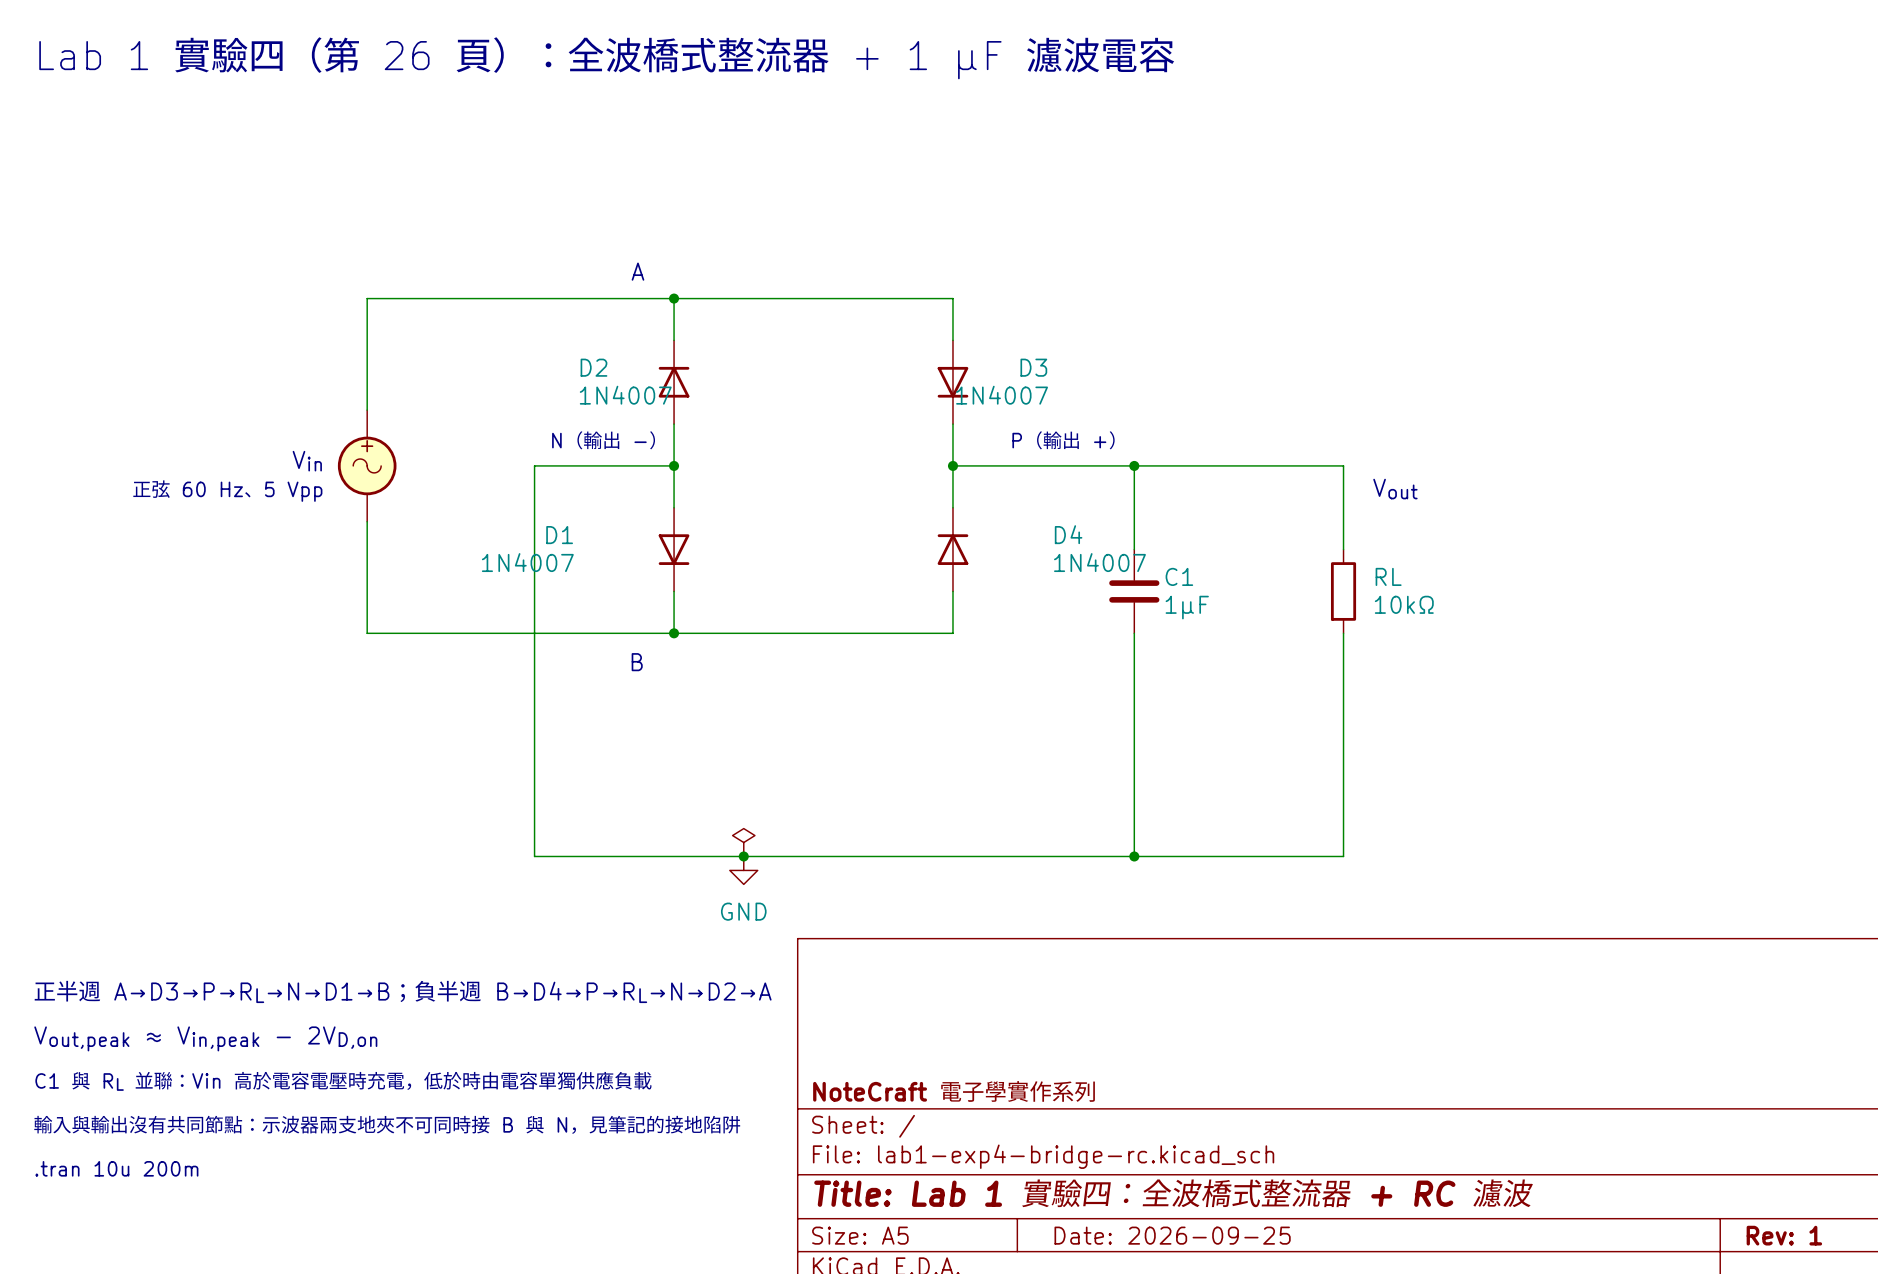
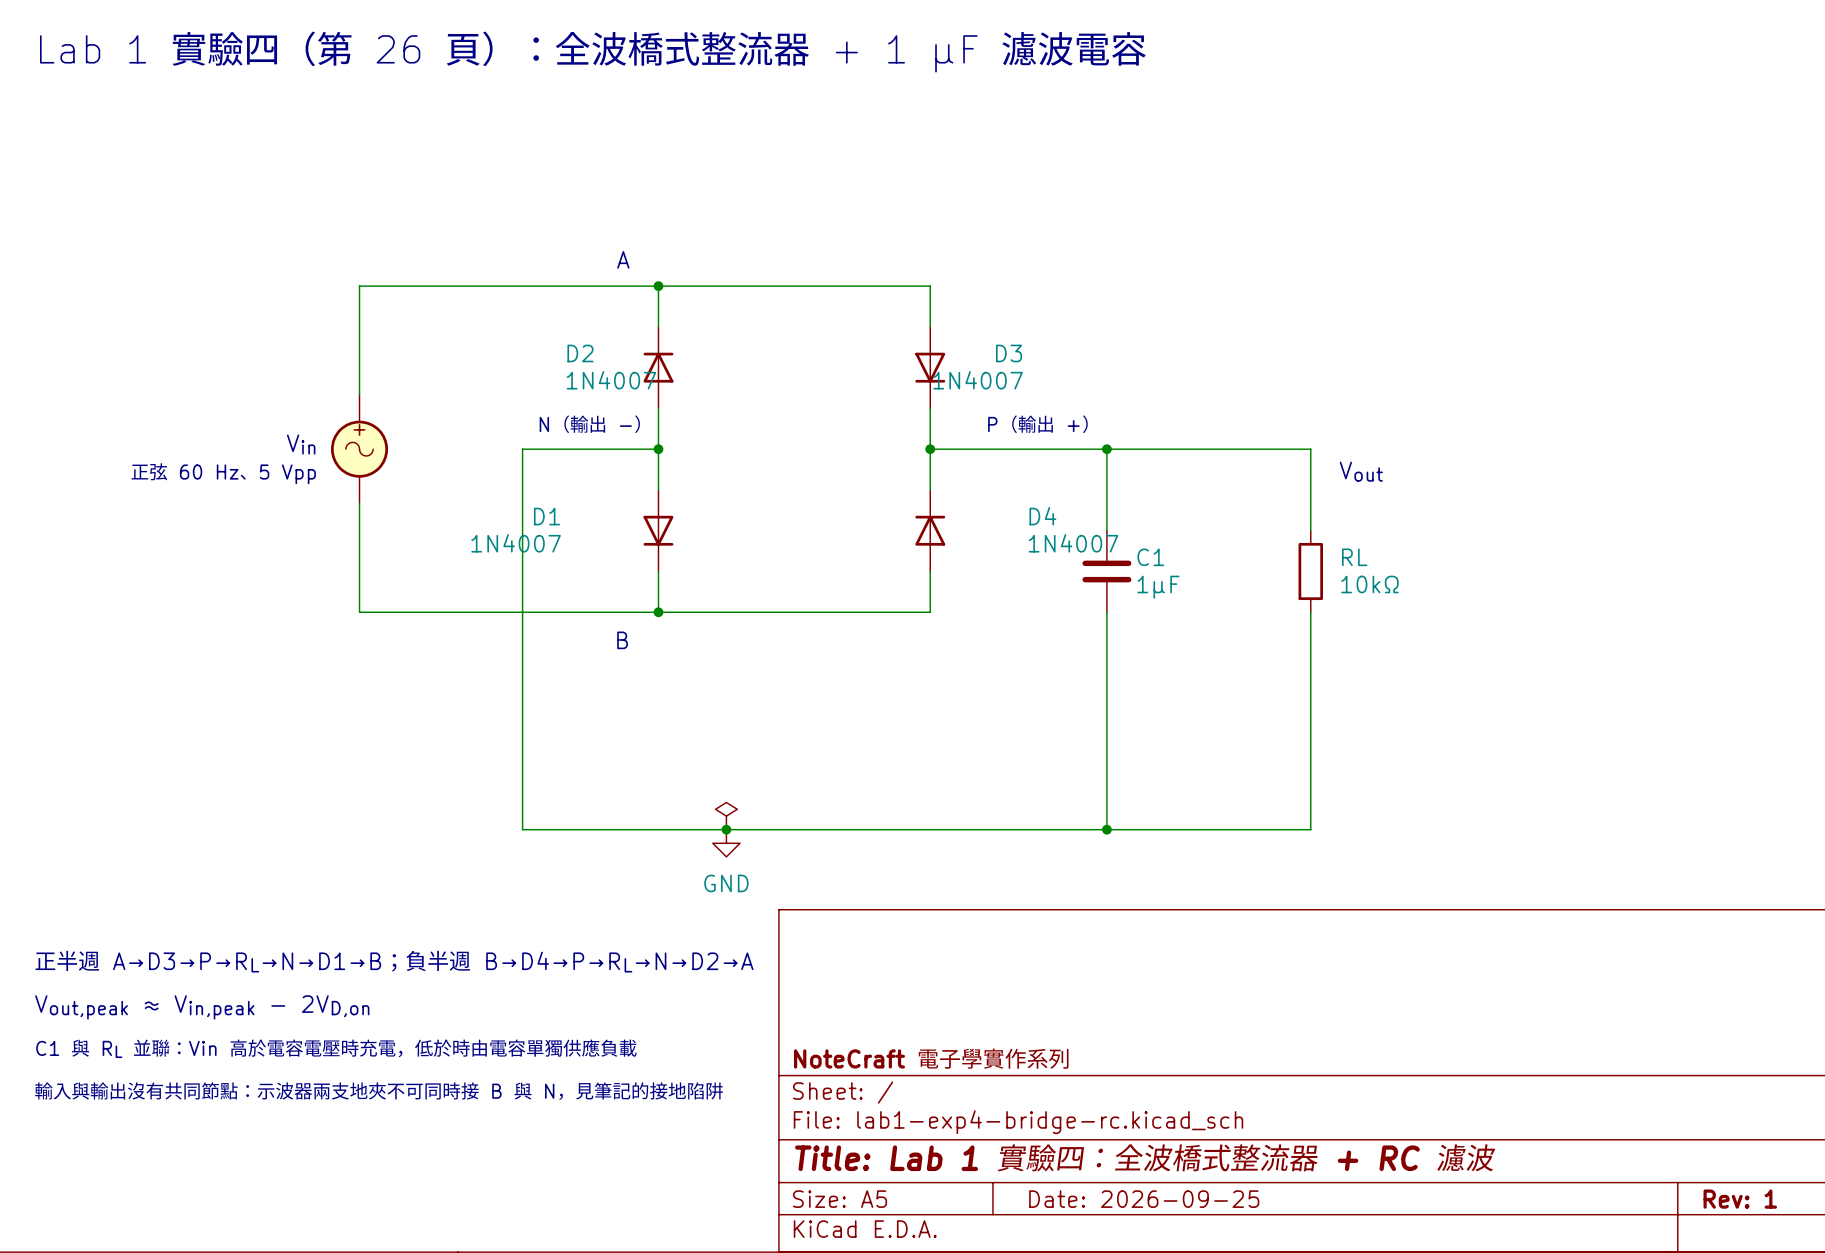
text: .tran 10u 200m (116, 1168) -> none

